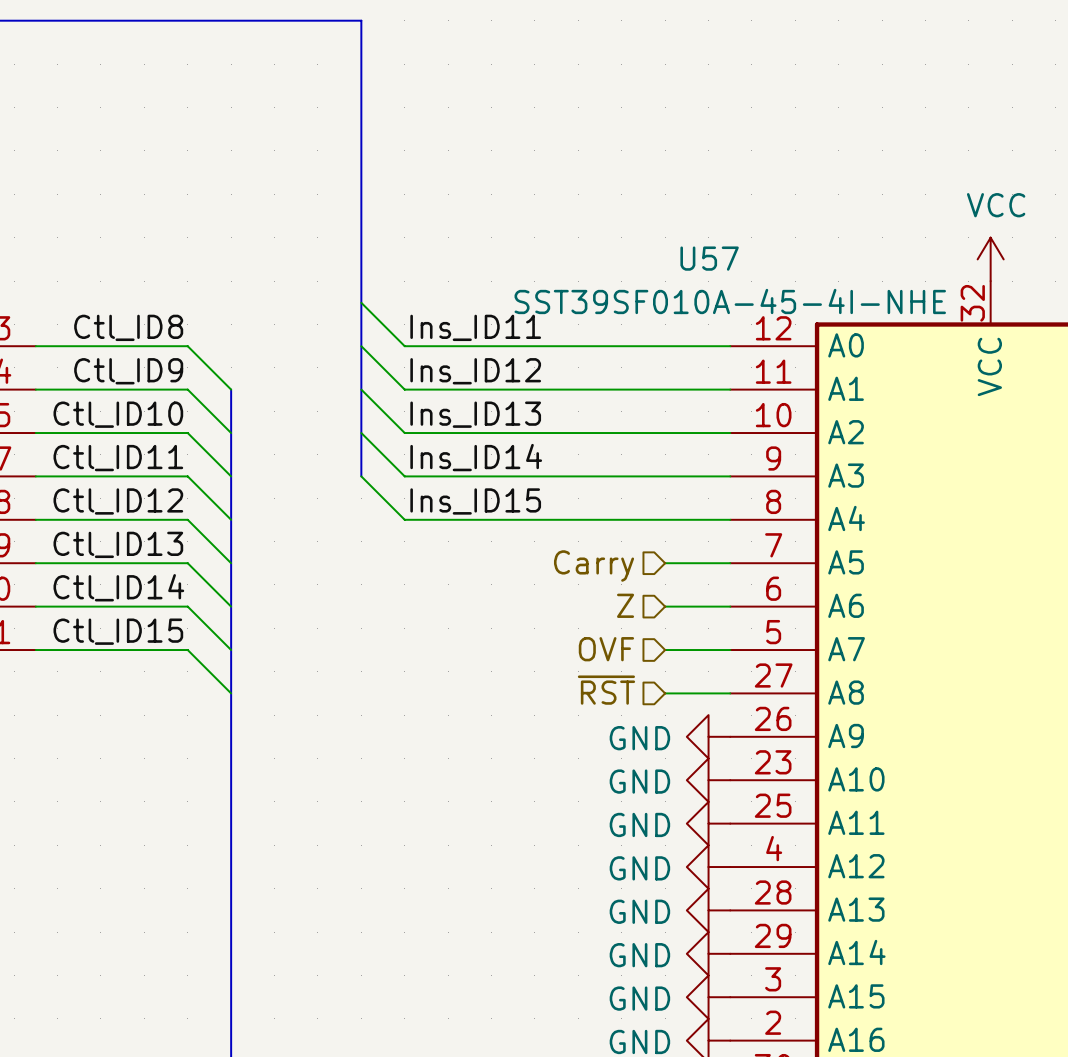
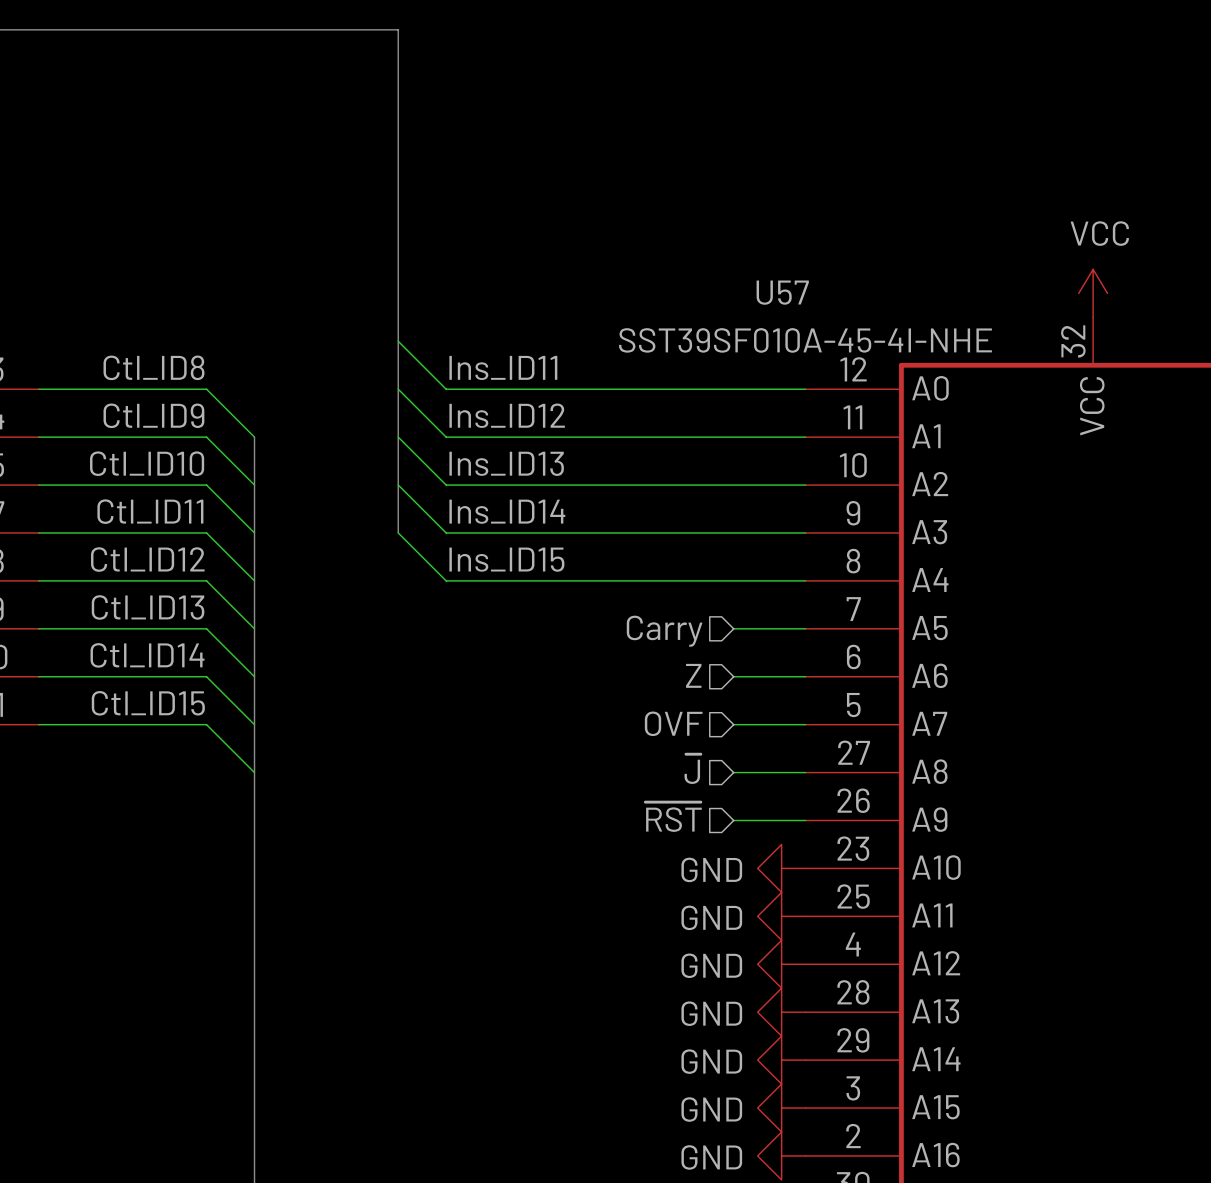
hierarchical label: ~{RST} (606, 690) -> ~{J} (692, 769)
hierarchical label: none -> ~{RST} (673, 817)
wire: none -> (733, 820) (805, 820)
power symbol: GND (708, 736) -> none

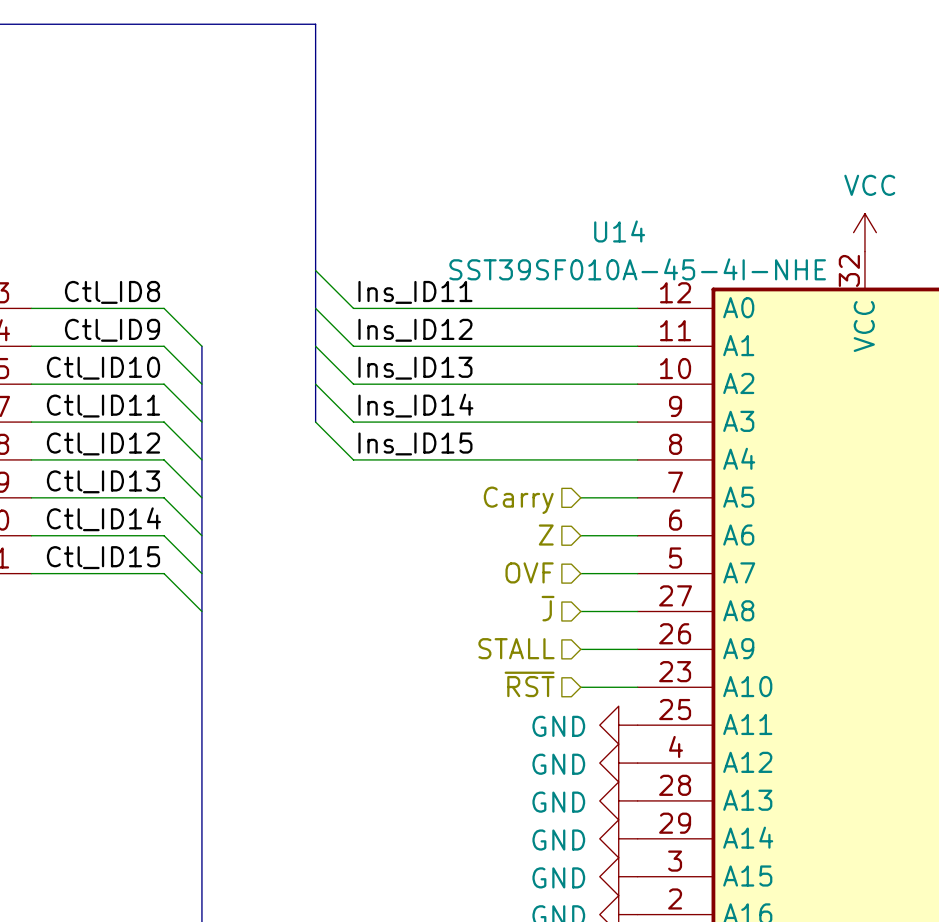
U57 name: U57 (782, 292) -> U14 (619, 231)
hierarchical label: ~{RST} (673, 817) -> STALL (516, 648)
hierarchical label: none -> ~{RST} (529, 684)
wire: none -> (580, 687) (637, 687)
power symbol: GND (781, 868) -> none

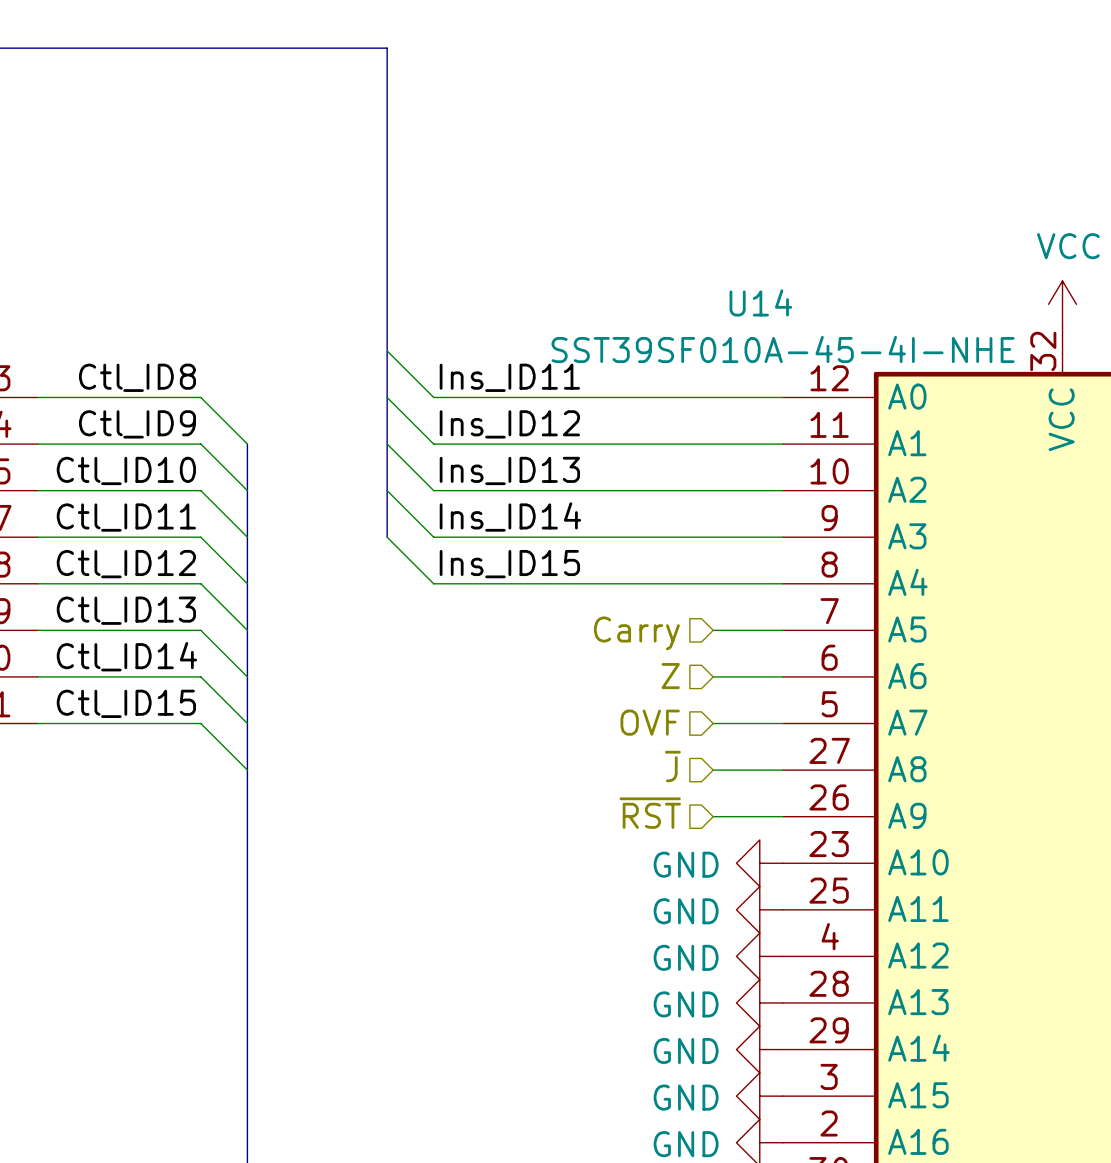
hierarchical label: STALL (516, 648) -> ~{RST} (650, 813)
hierarchical label: ~{RST} (529, 684) -> none
wire: (580, 687) (637, 687) -> none
power symbol: none -> GND (759, 863)

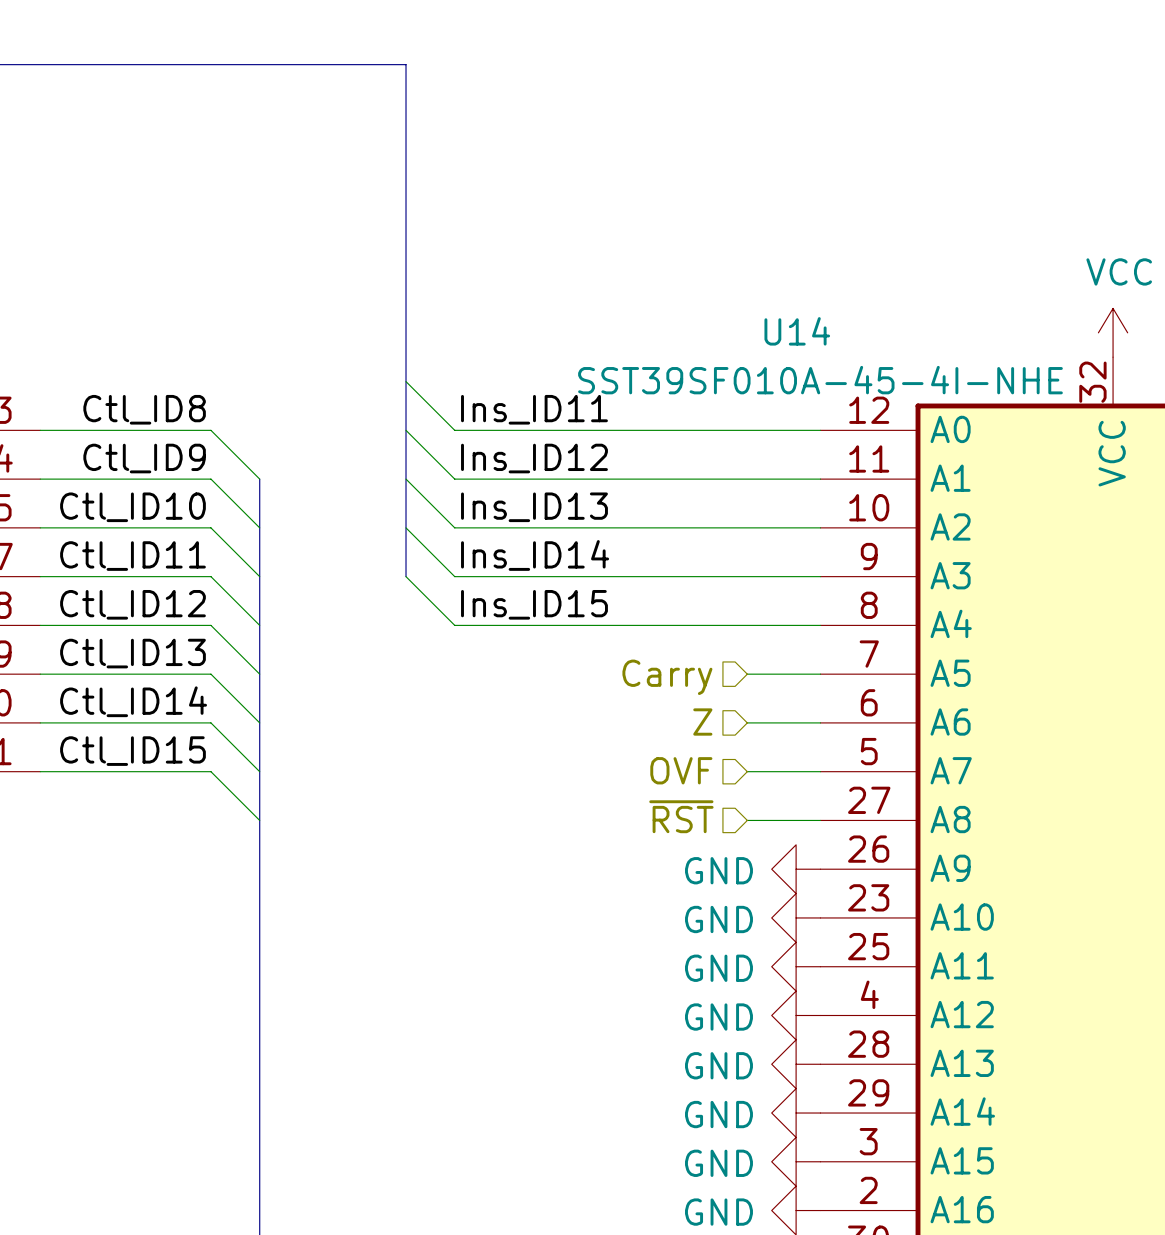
hierarchical label: ~{J} (672, 766) -> ~{RST} (681, 816)
hierarchical label: ~{RST} (650, 813) -> none
wire: (713, 816) (783, 816) -> none
power symbol: none -> GND (796, 869)

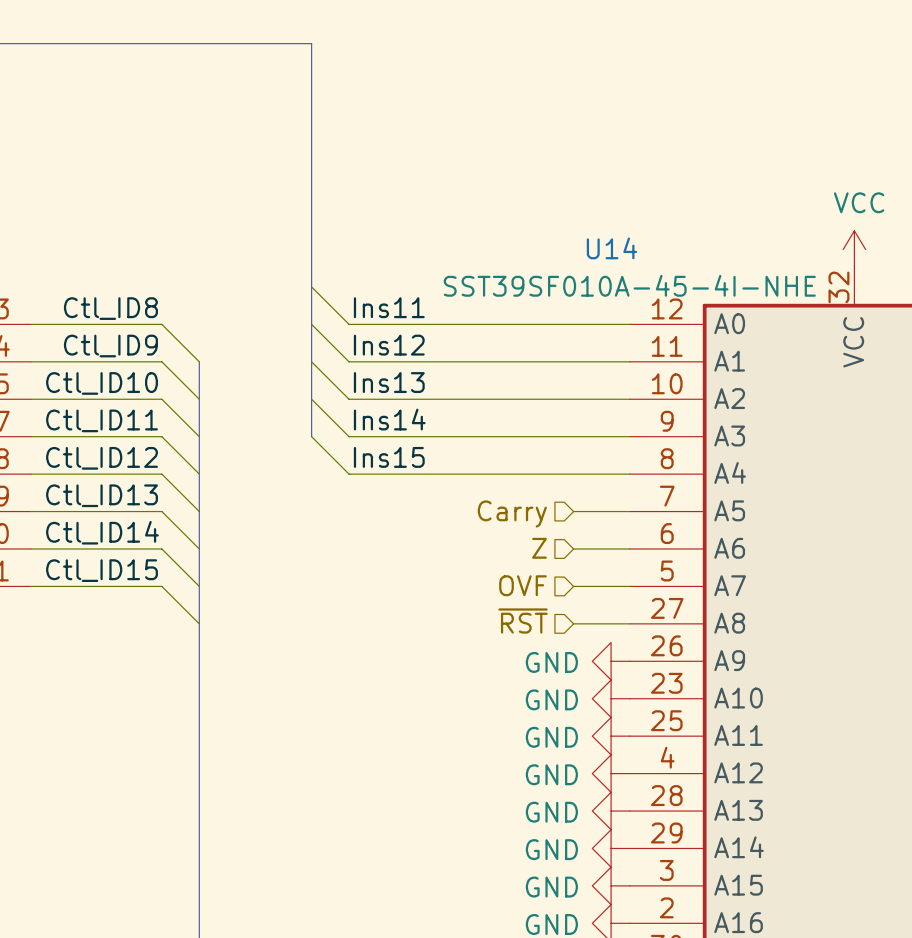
label: Ins_ID11 (534, 409) -> Ins11 (389, 307)
label: Ins_ID12 (534, 458) -> Ins12 (389, 345)
label: Ins_ID13 (534, 507) -> Ins13 (389, 382)
label: Ins_ID14 (535, 555) -> Ins14 (389, 419)
label: Ins_ID15 (534, 604) -> Ins15 (389, 457)

